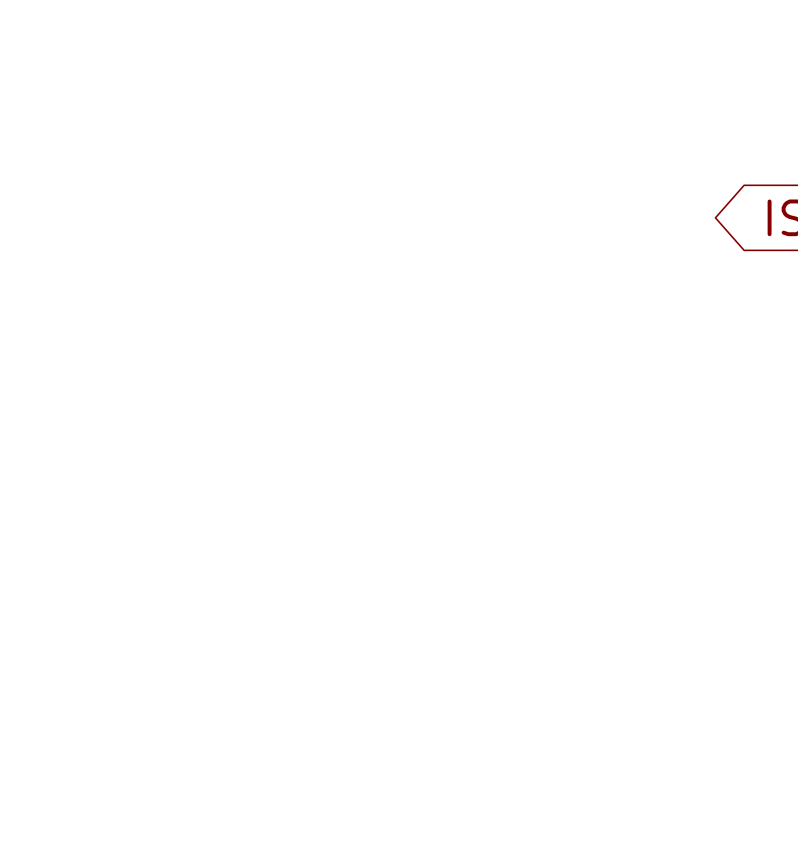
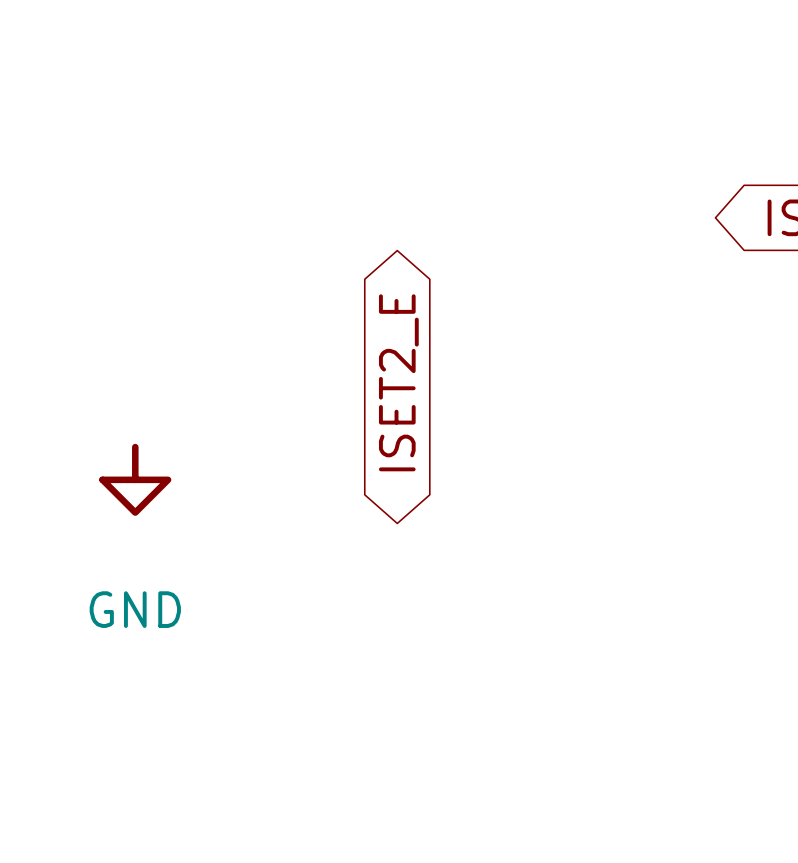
global label: none -> ISET2_E (398, 382)
power symbol: none -> GND (135, 479)

